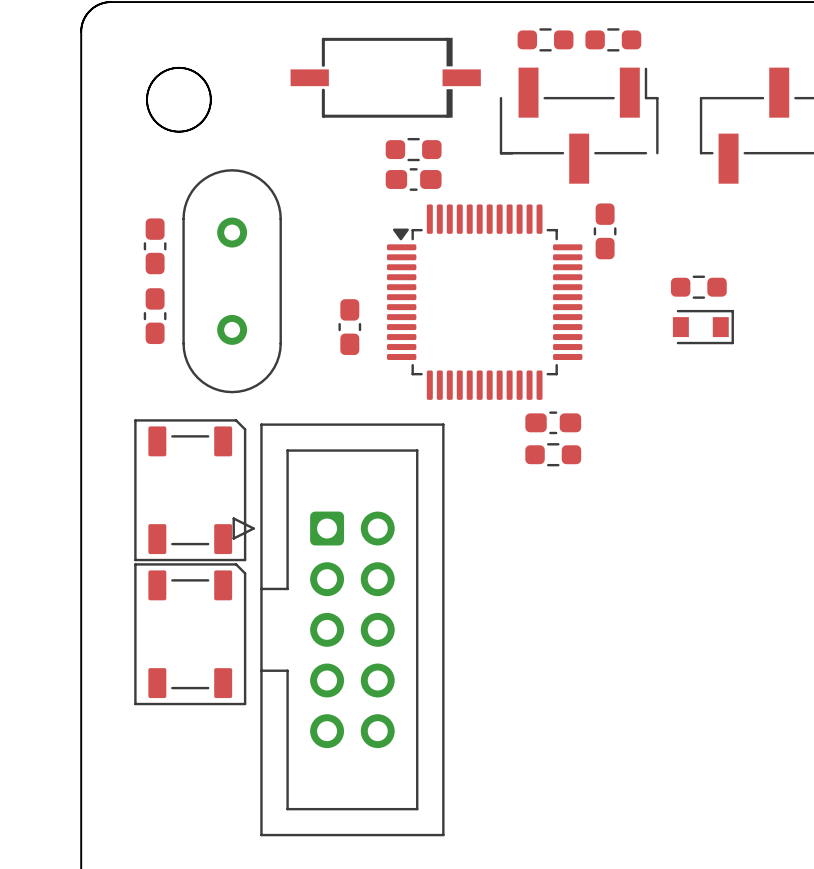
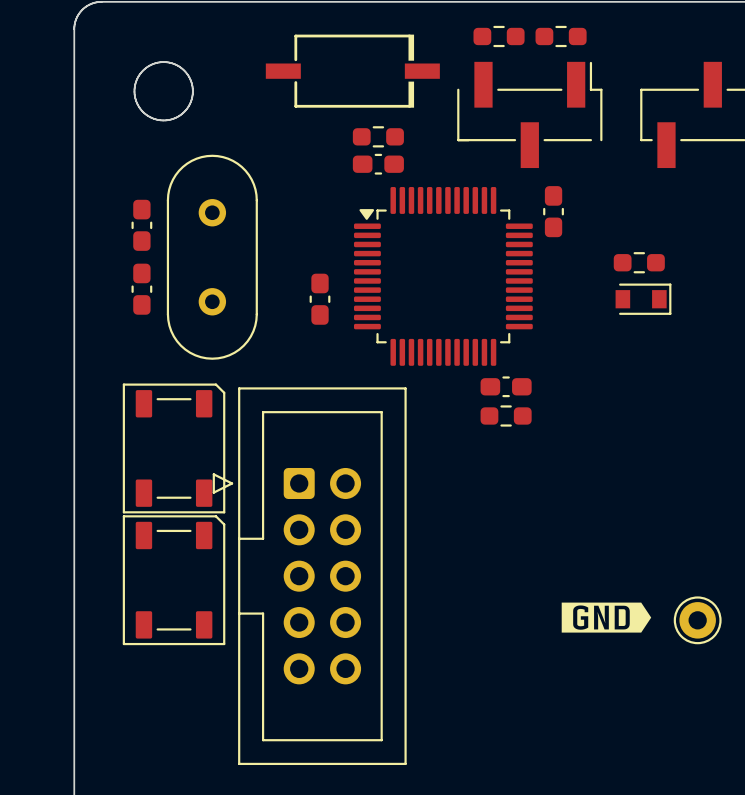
drawing: none -> [561, 602, 652, 633]
part: none -> (697, 620)

